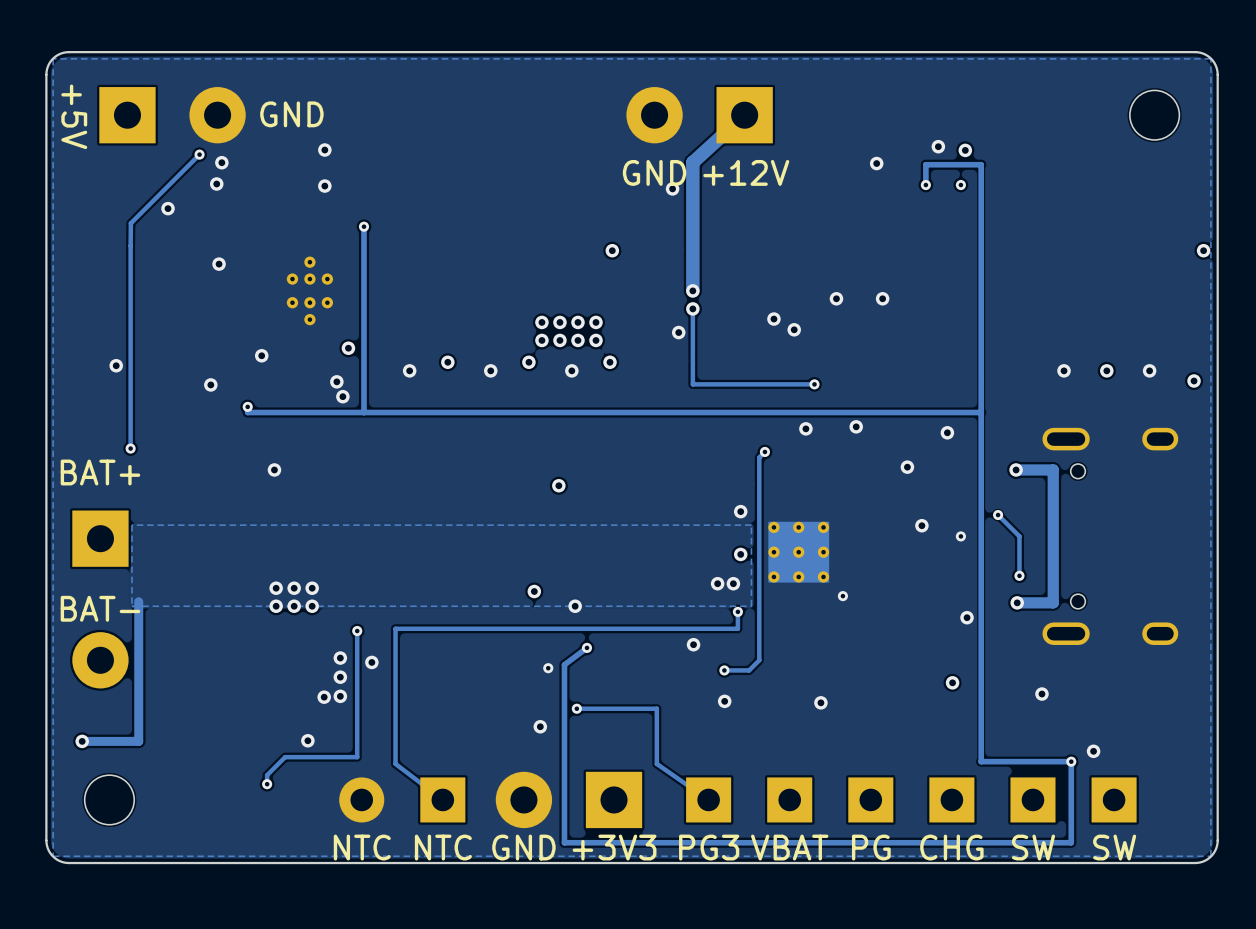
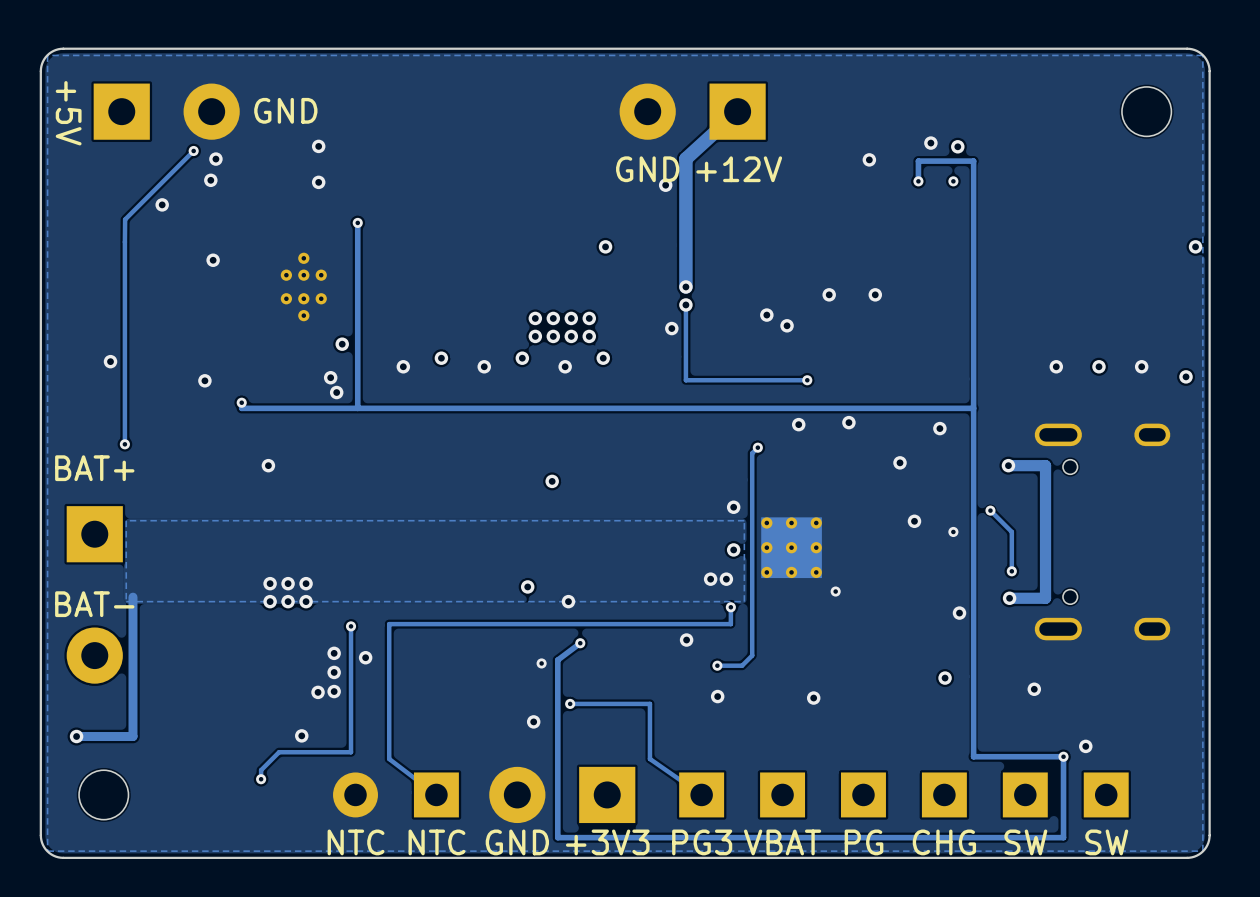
via: (261, 355) -> none

